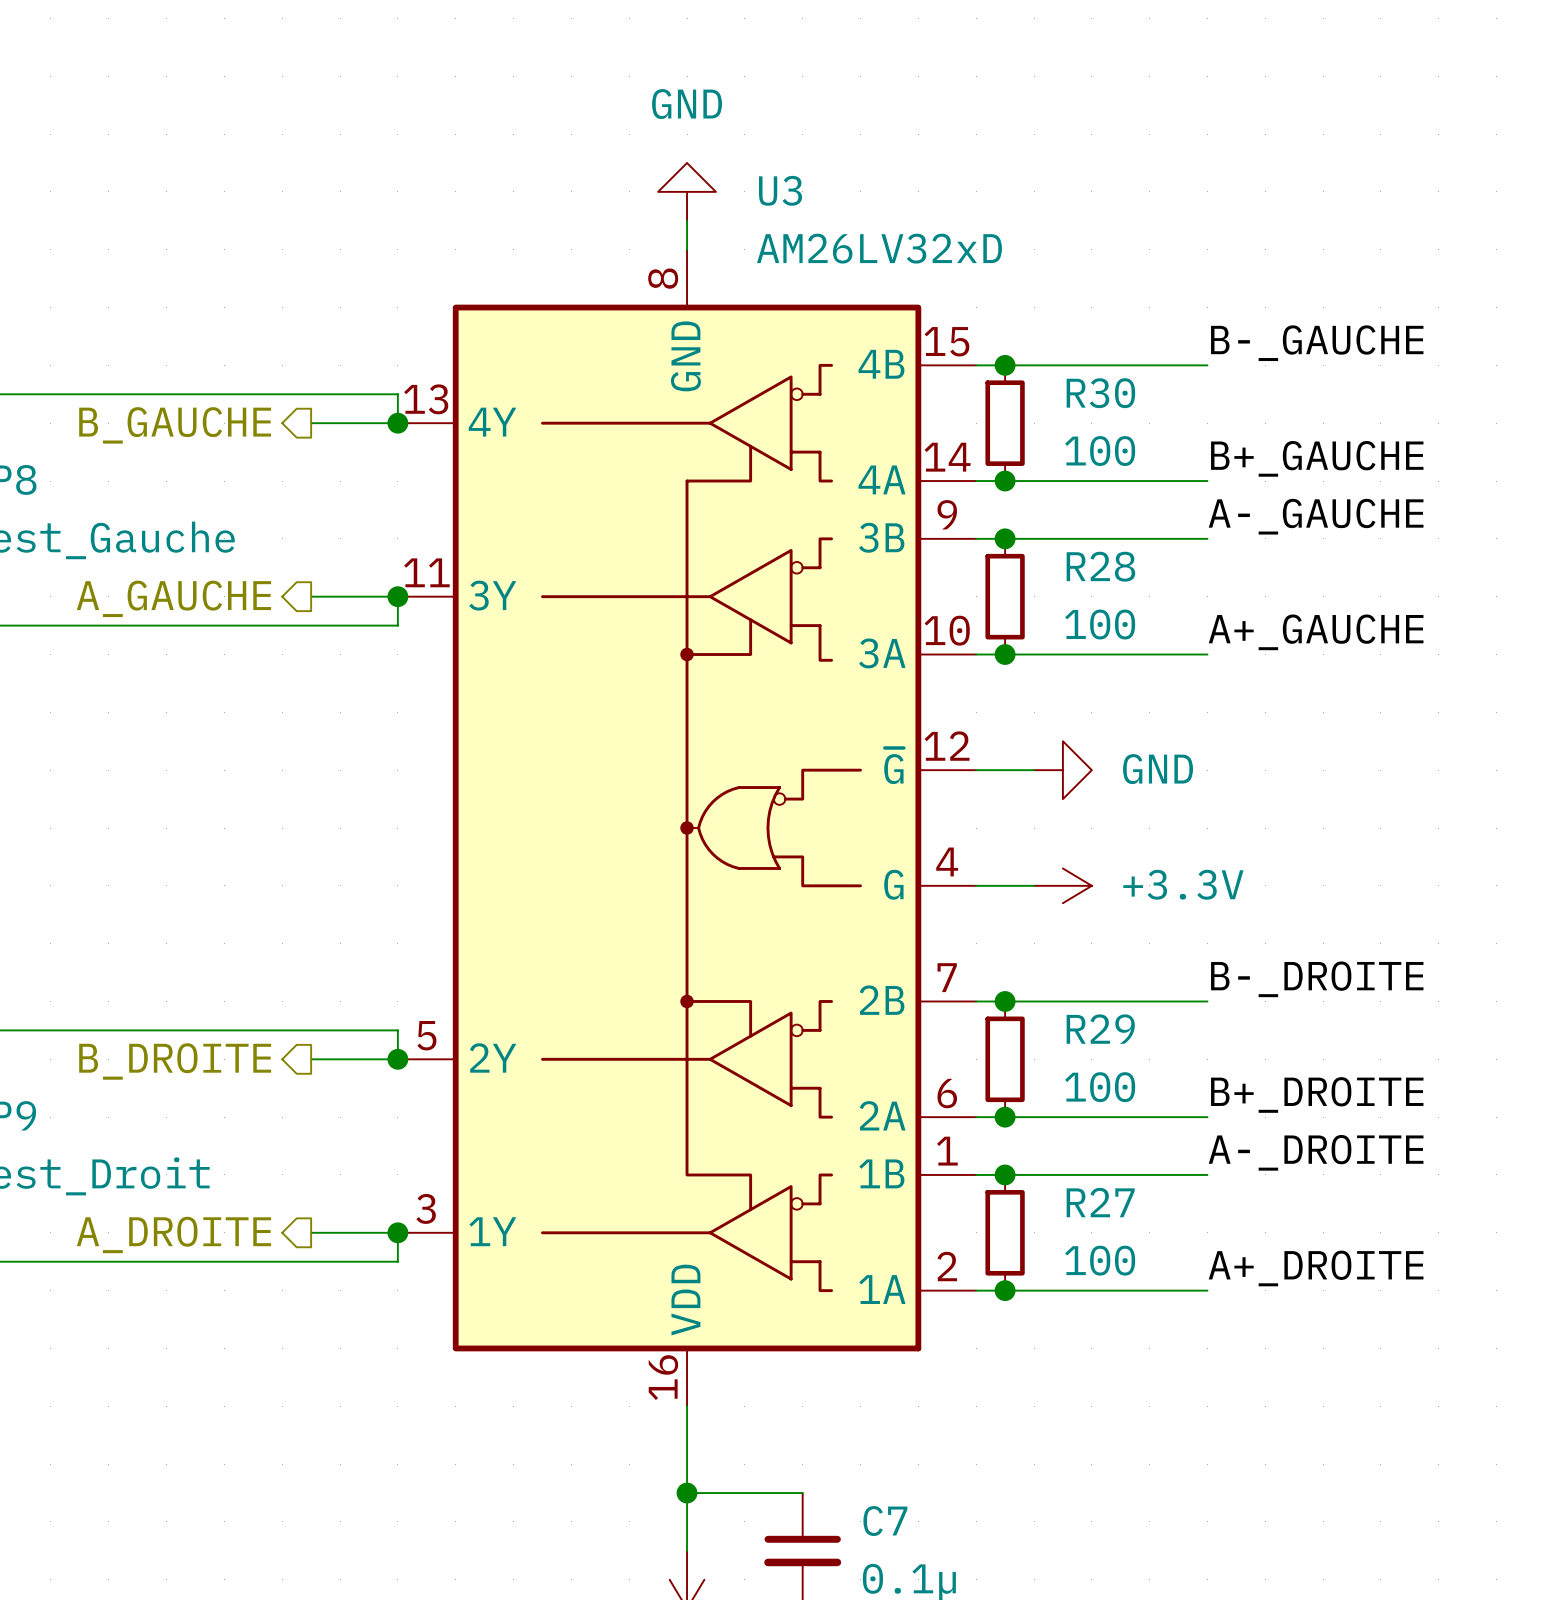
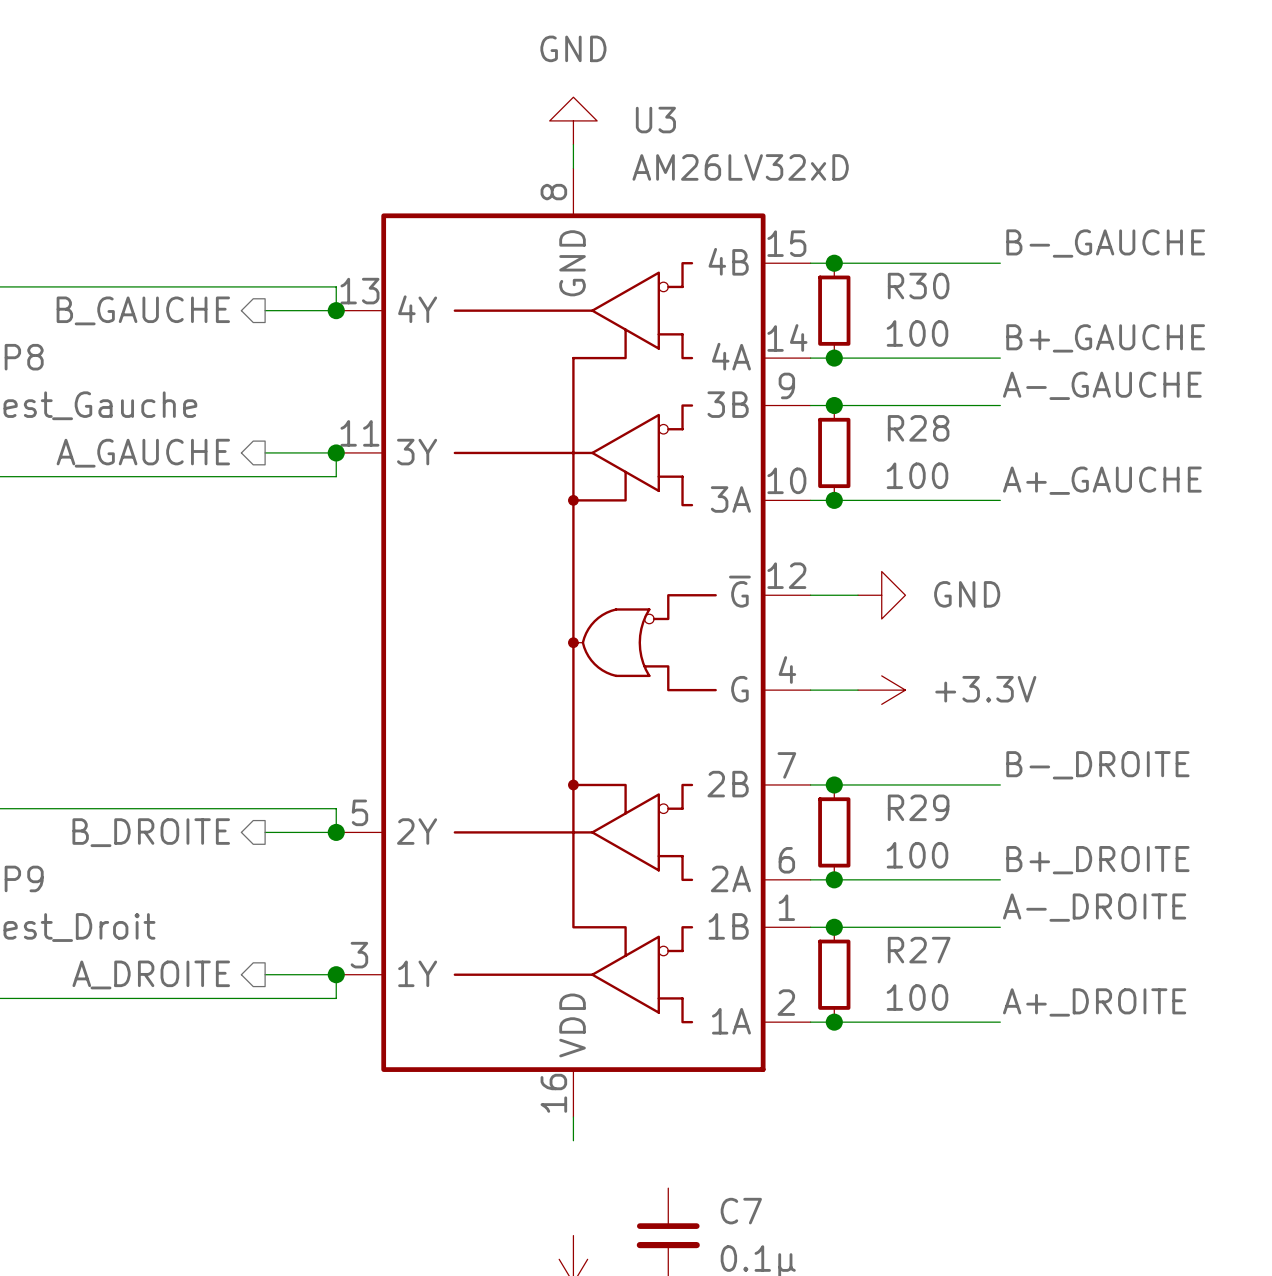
wire: (687, 1435) (687, 1550) -> none
wire: (687, 1493) (802, 1493) -> none
junction: (687, 1493) -> none

